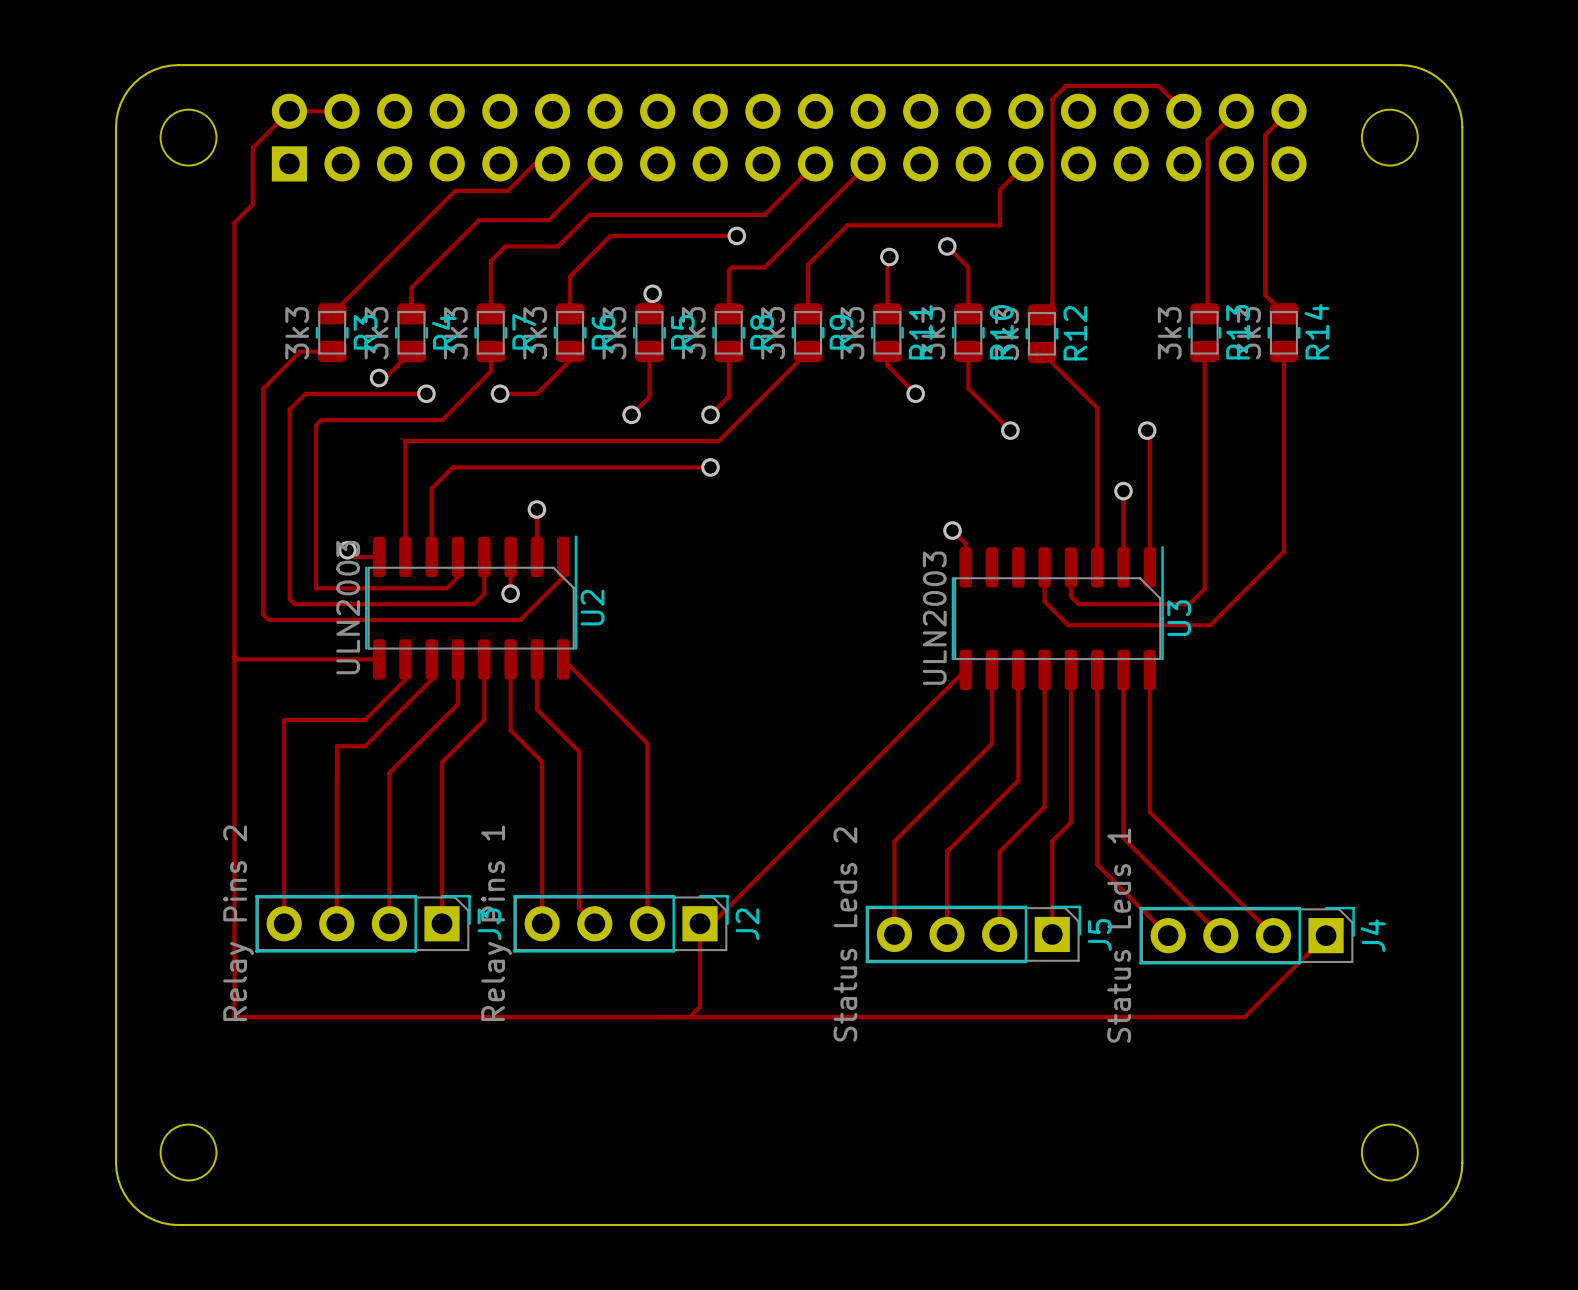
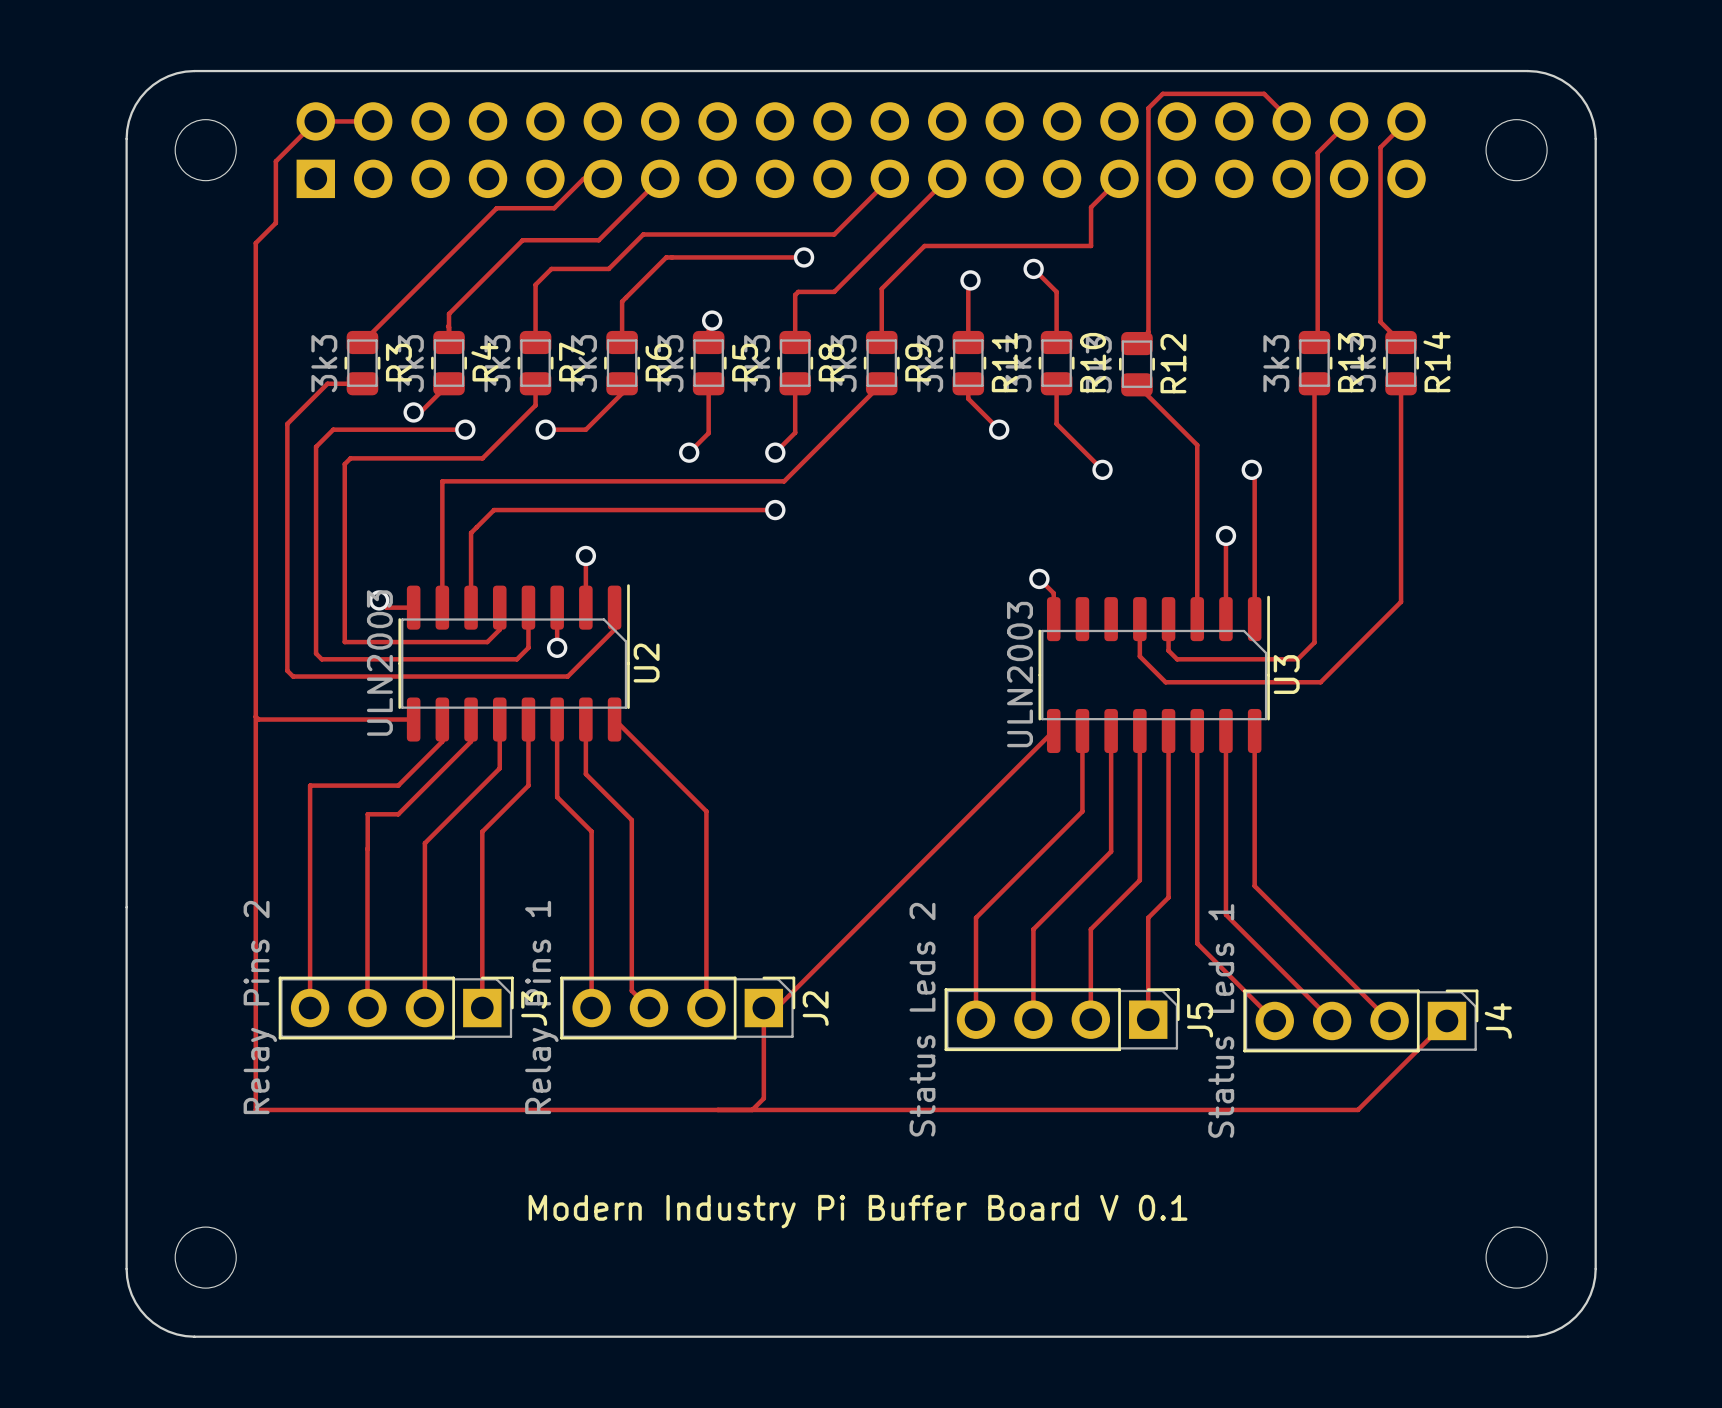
text: none -> Modern Industry Pi Buffer Board V 0.1 (858, 1211)

